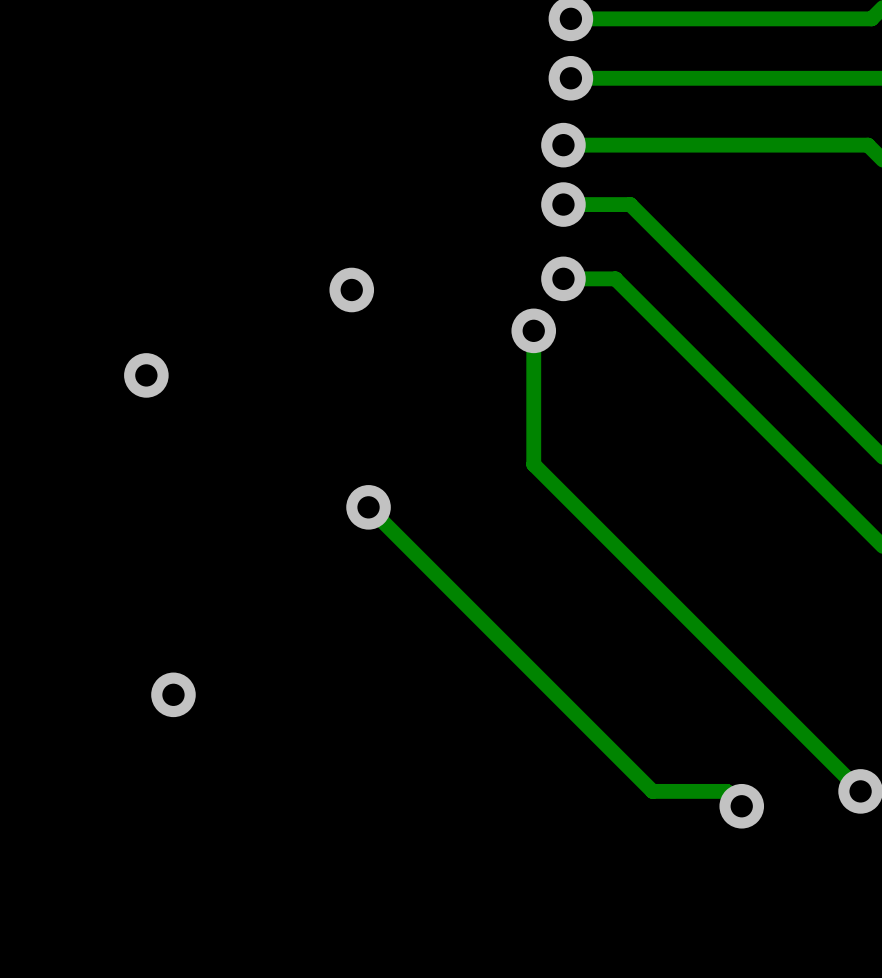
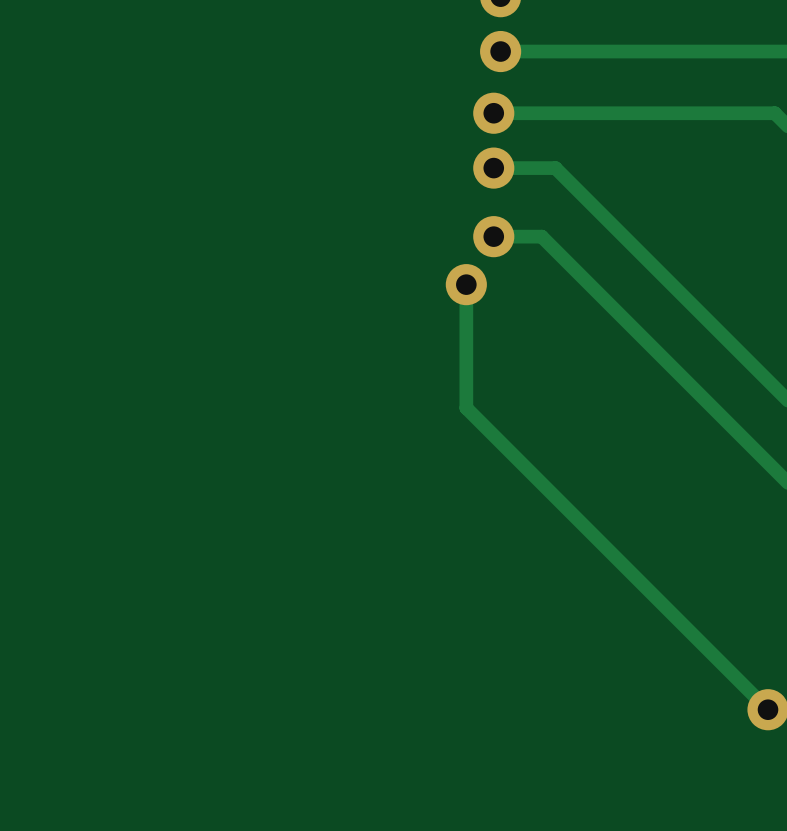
via: (351, 289) -> none
via: (146, 375) -> none
track: (368, 507) (652, 791) (726, 791) (741, 806) -> none
via: (368, 507) -> none
via: (173, 694) -> none
via: (741, 806) -> none

